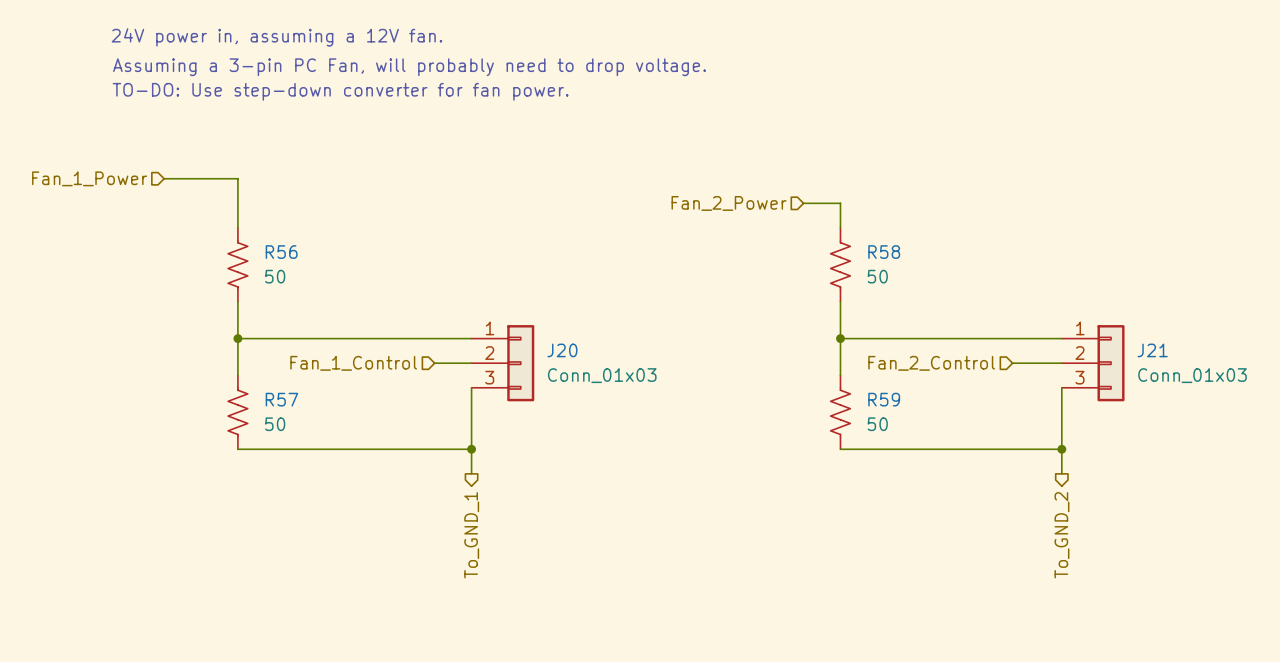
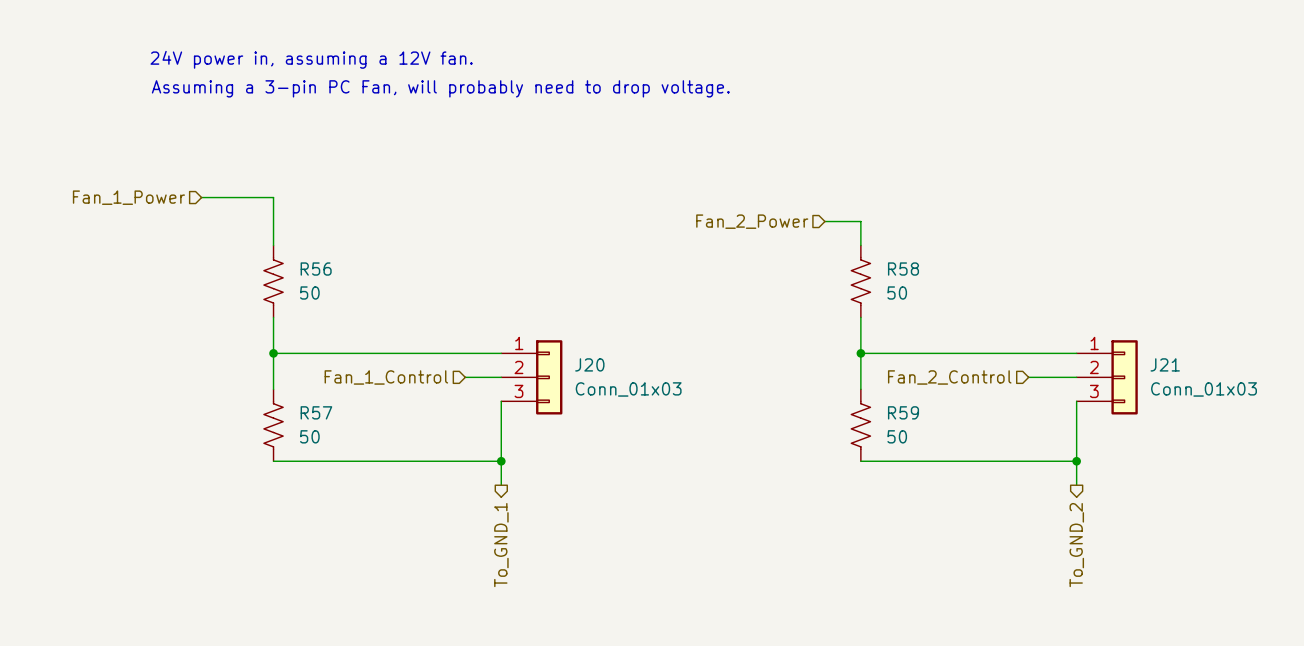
text: TO-DO: Use step-down converter for fan power. (340, 91) -> none

